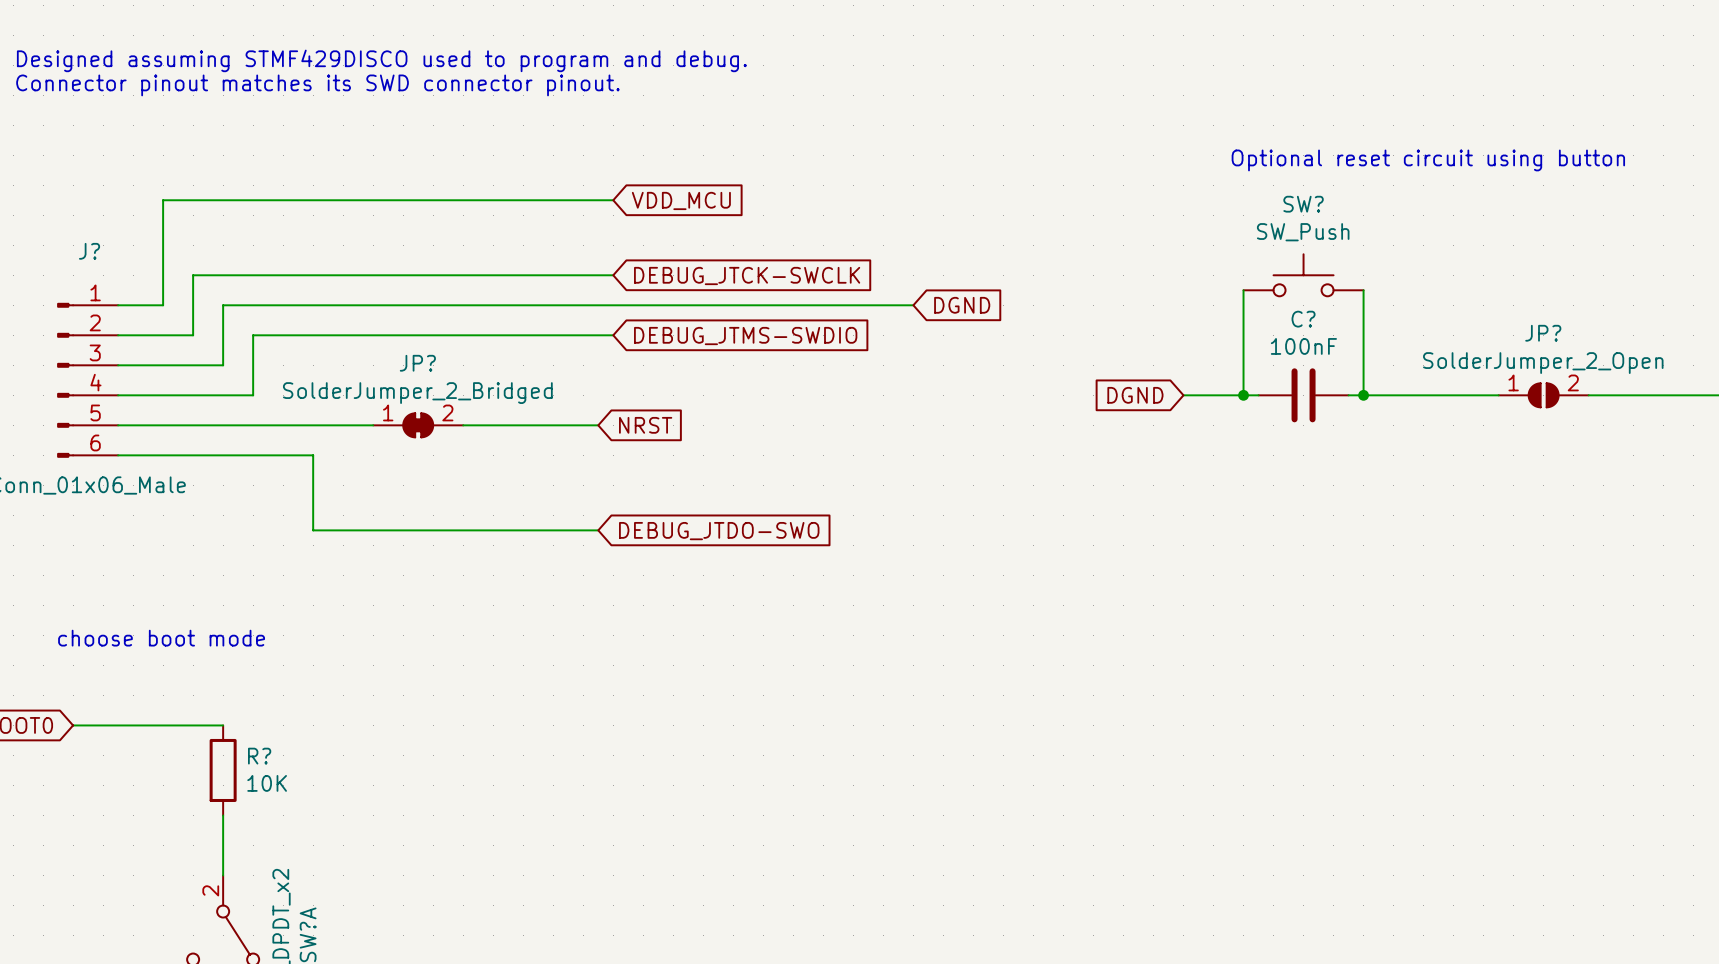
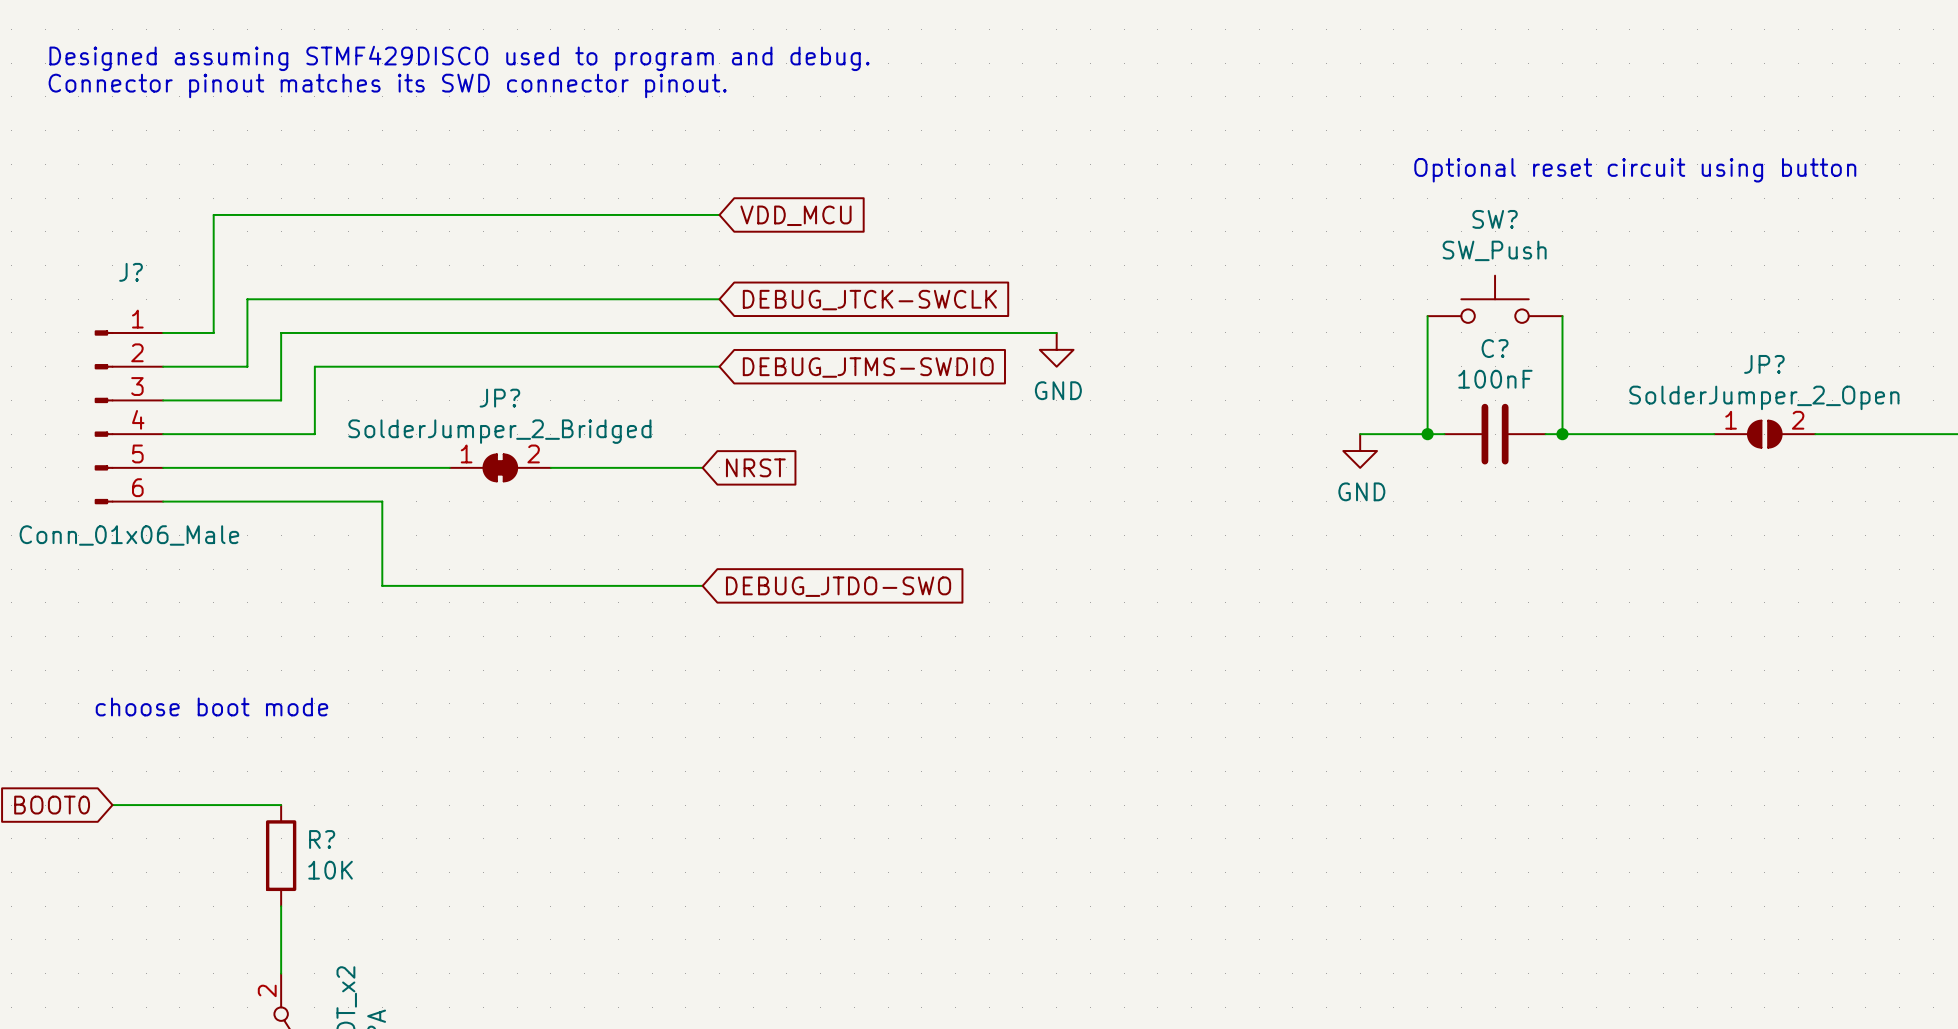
global label: DGND (962, 305) -> none
power symbol: none -> GND (1056, 349)
global label: DGND (1135, 395) -> none
power symbol: none -> GND (1360, 451)

